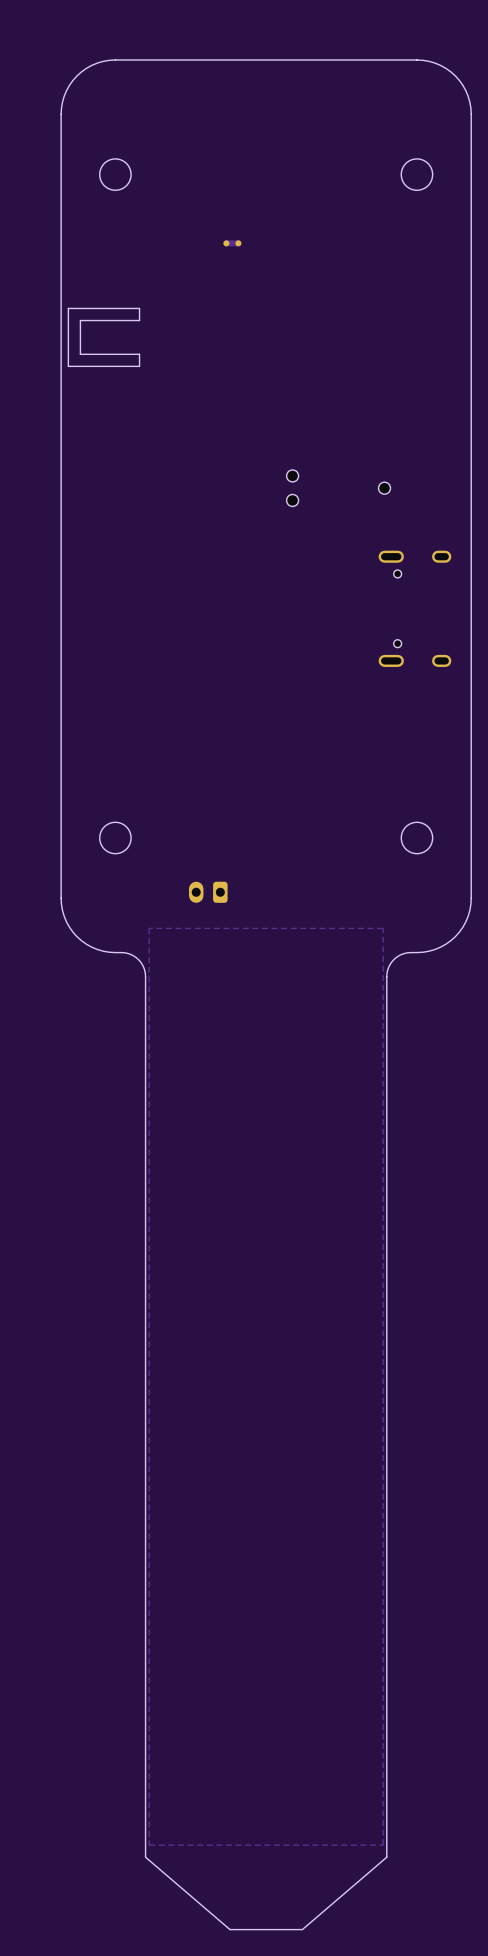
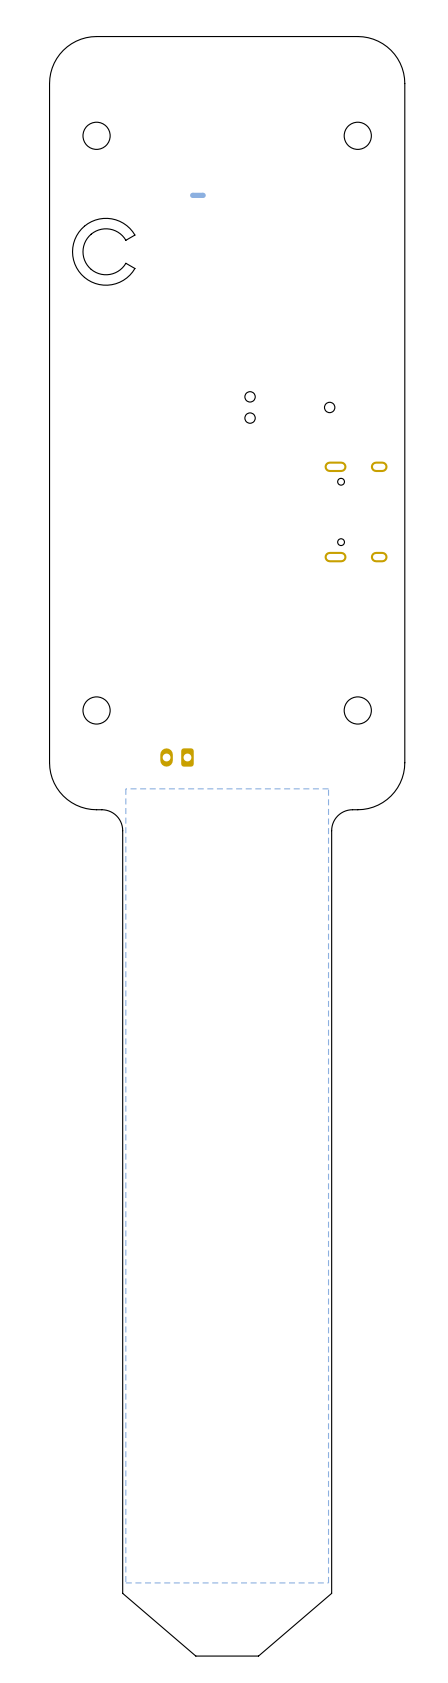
board edge: none -> (84, 226) (99, 219) (111, 218) (123, 223) (132, 231) (134, 235) (125, 240) (115, 230) (107, 228) (98, 229) (87, 238) (83, 248) (84, 260) (93, 271) (101, 274) (109, 274) (117, 271) (125, 263) (134, 268) (126, 277) (115, 283) (99, 284) (87, 279) (78, 271) (73, 260) (72, 247) (76, 235) (84, 226)
board edge: (139, 308) (68, 308) (68, 366) (139, 366) (139, 354) (80, 354) (80, 320) (139, 320) (139, 308) -> none

